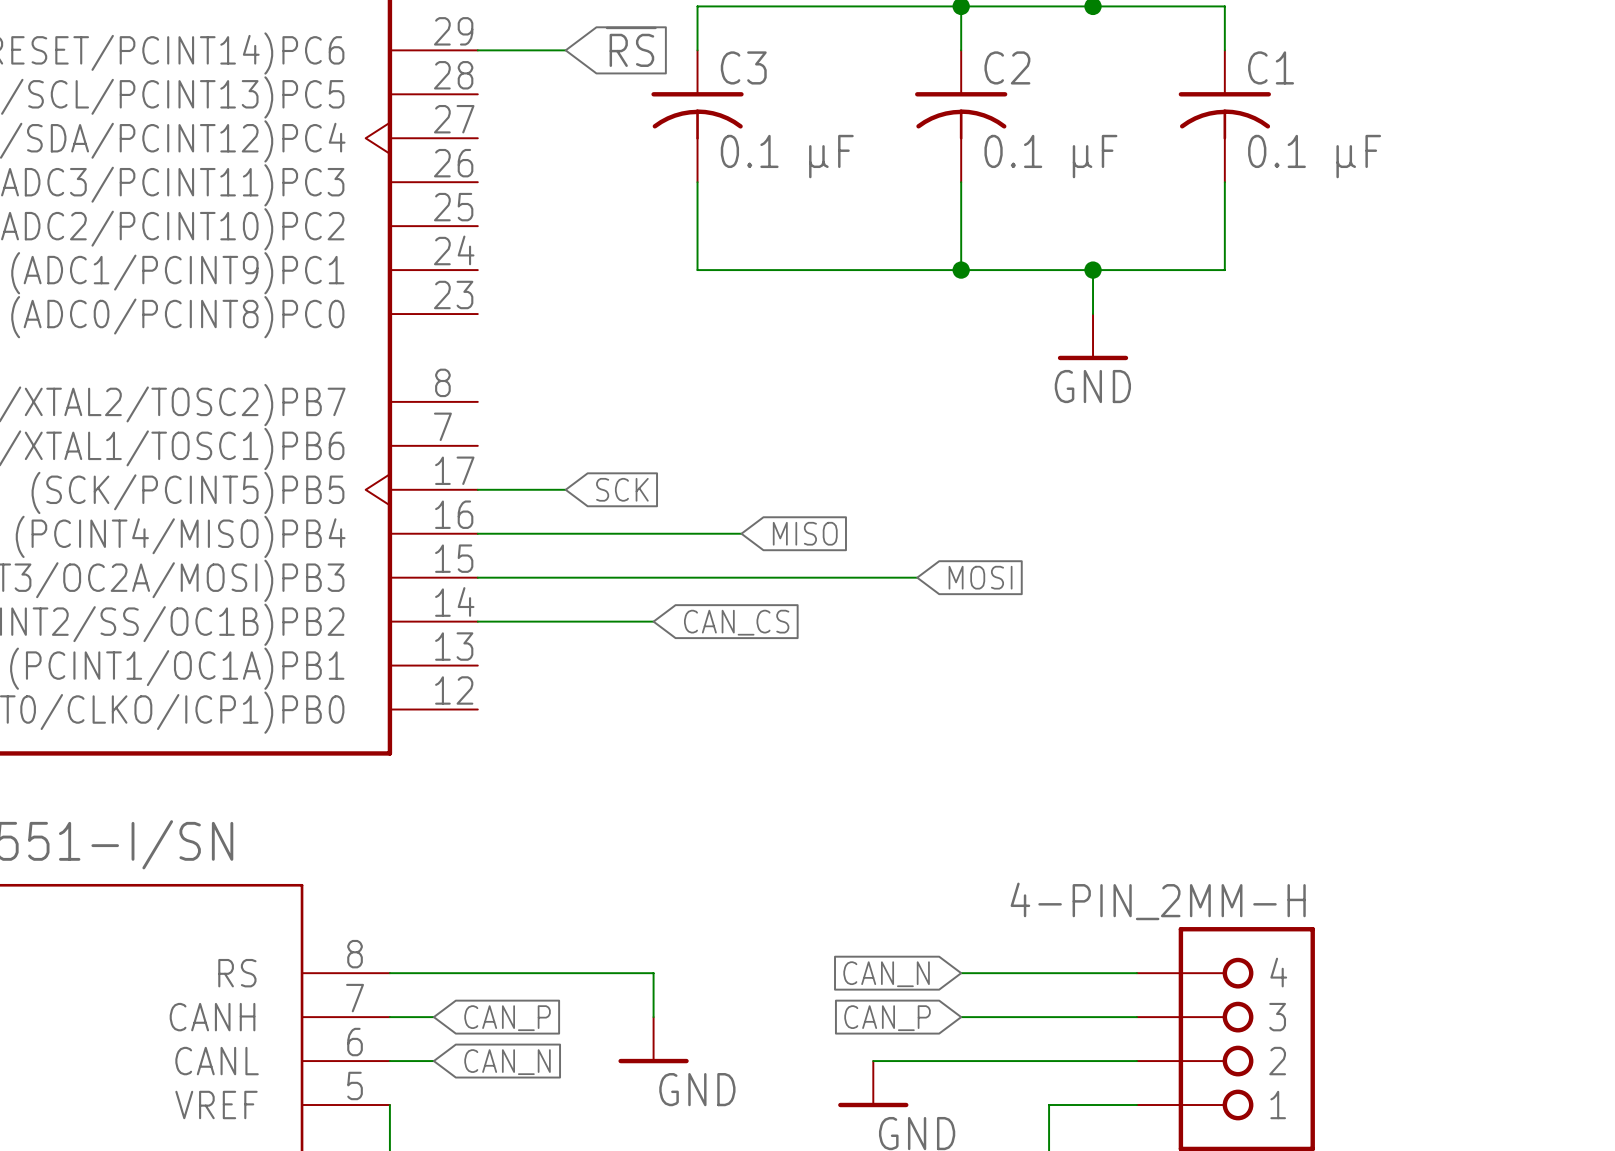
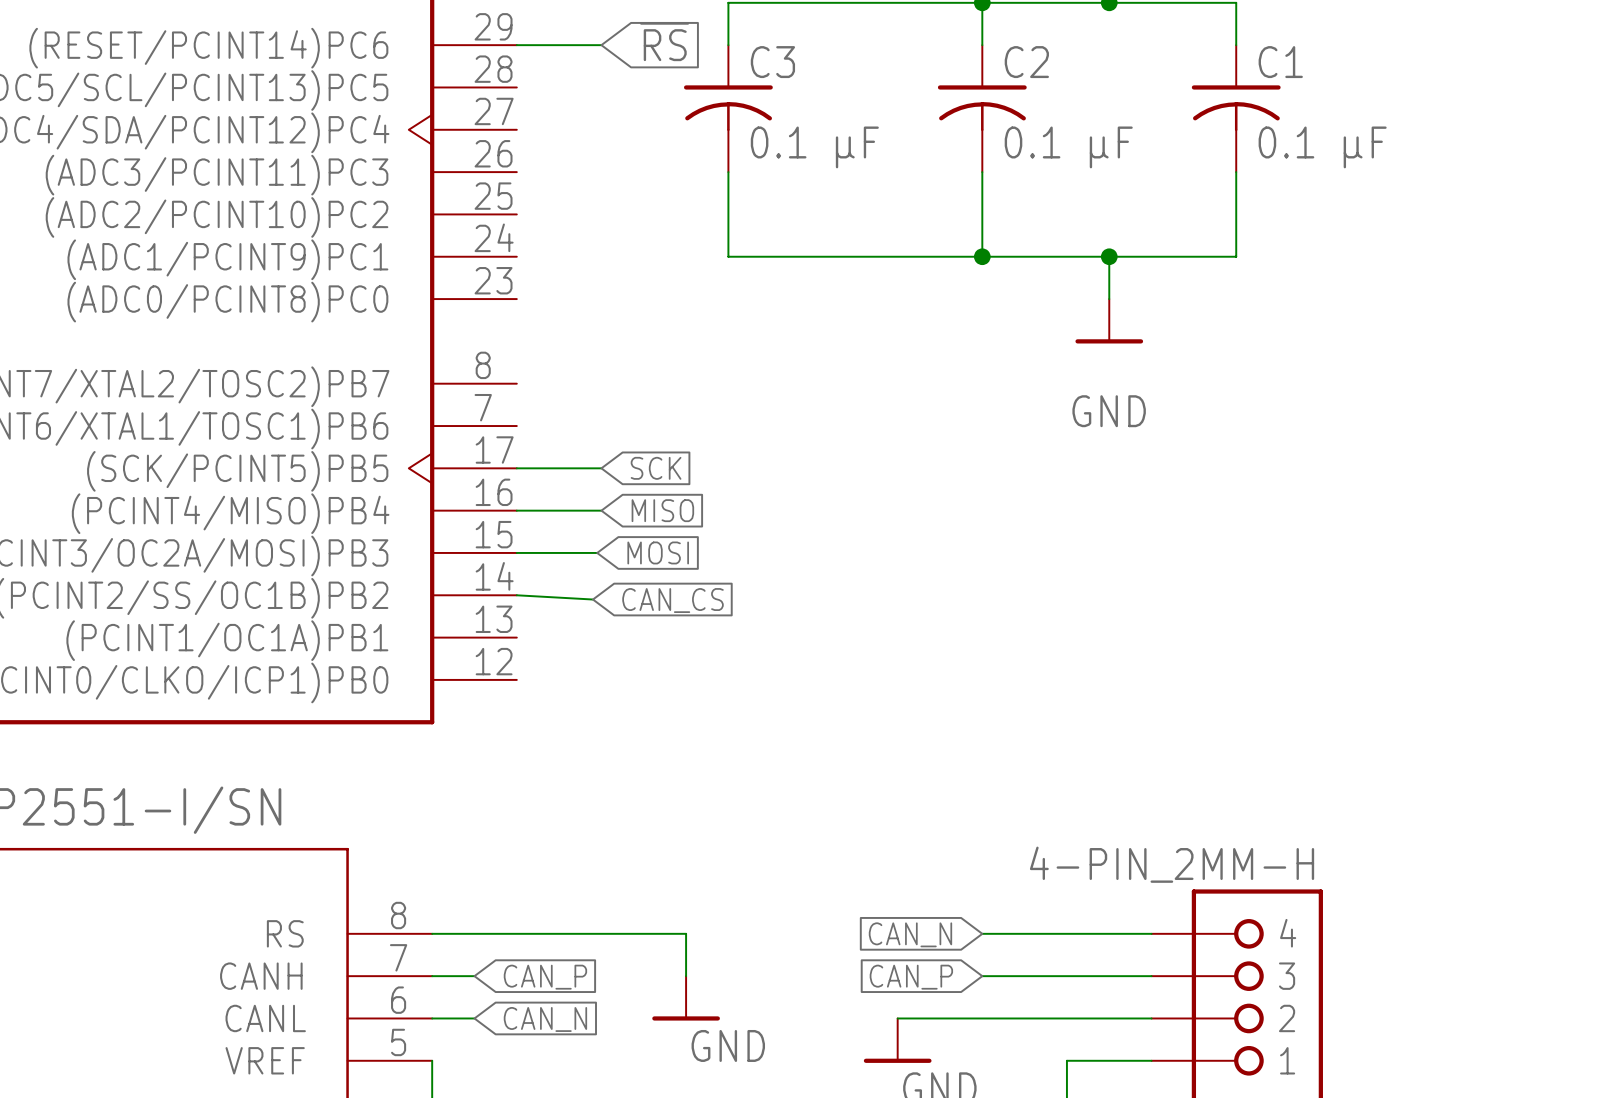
power symbol text position: GND (1092, 386) -> GND (1109, 411)
wire: (565, 533) (741, 533) -> none
global label position: MISO (805, 533) -> MISO (662, 510)
wire: (561, 577) (917, 577) -> none
global label position: MOSI (980, 577) -> MOSI (658, 552)
wire: (477, 621) (653, 621) -> (516, 595) (592, 599)
global label position: CAN_CS (736, 622) -> CAN_CS (672, 600)

